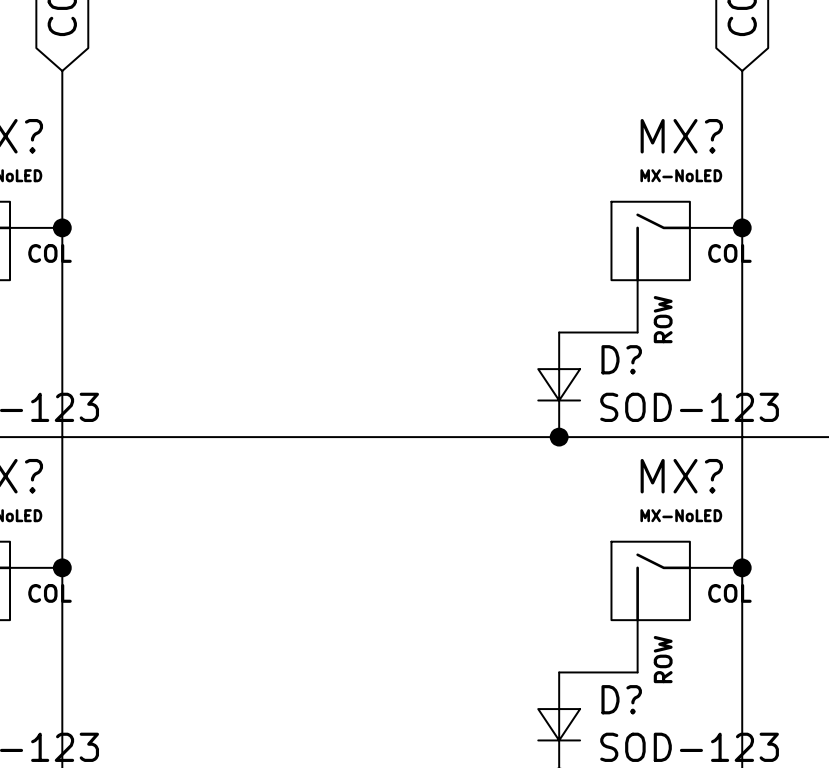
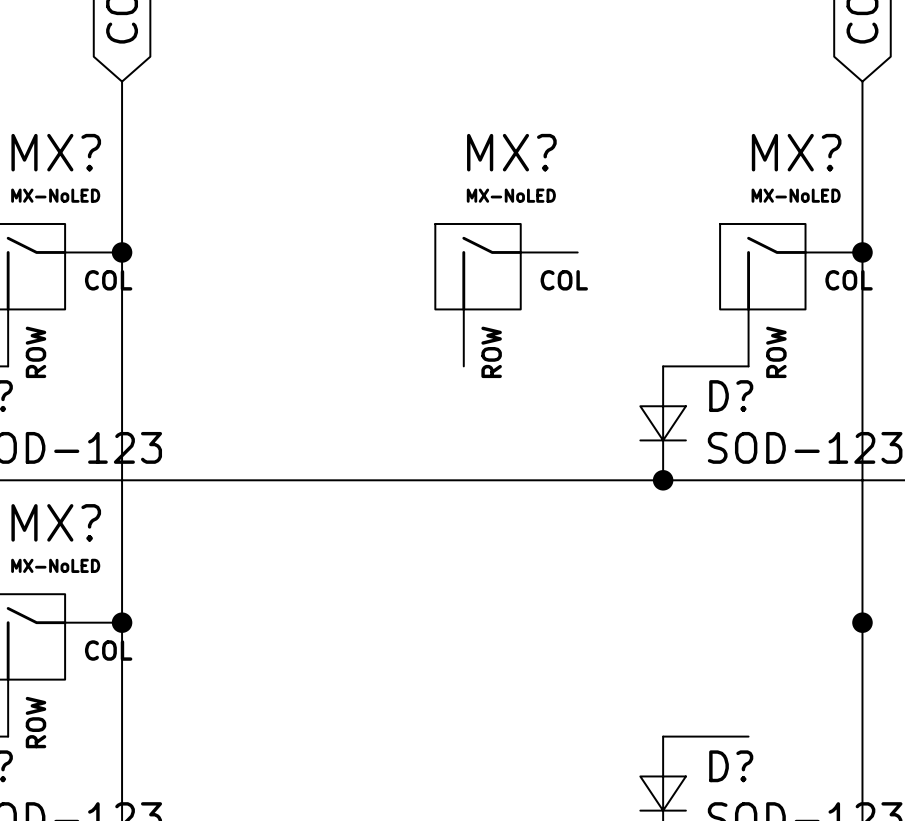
MX?: none -> MX-NoLED (506, 295)
MX?: MX-NoLED (676, 607) -> none

